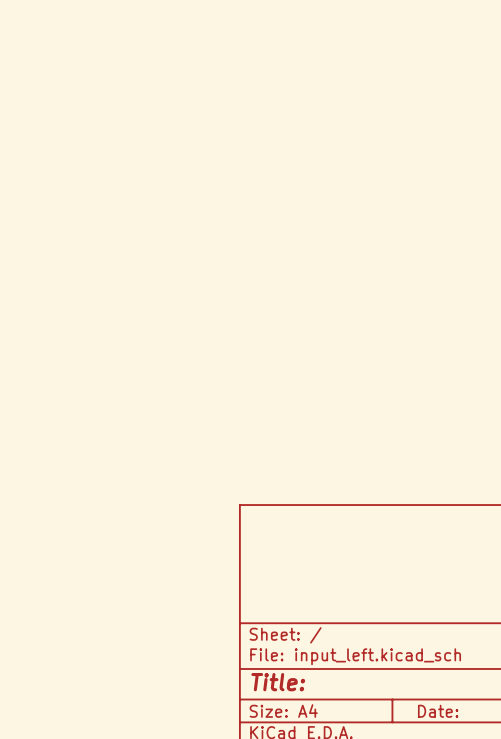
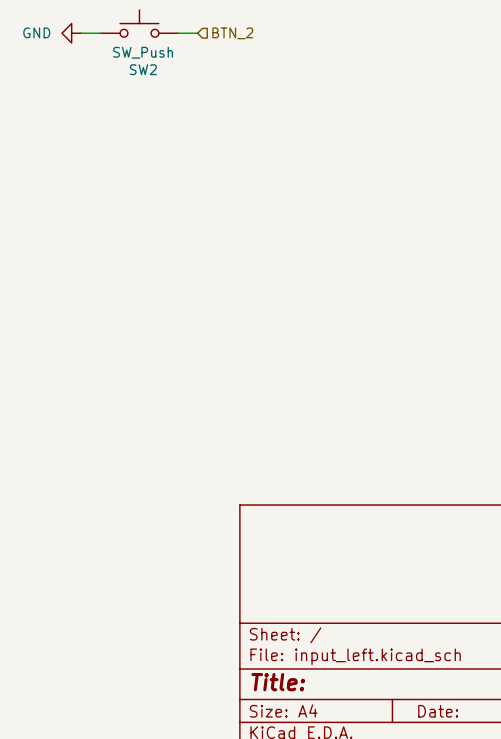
SW2: none -> SW_Push (139, 23)
power symbol: none -> GND (71, 33)
wire: none -> (81, 33) (100, 33)
wire: none -> (178, 33) (197, 33)
hierarchical label: none -> BTN_2 (232, 33)

